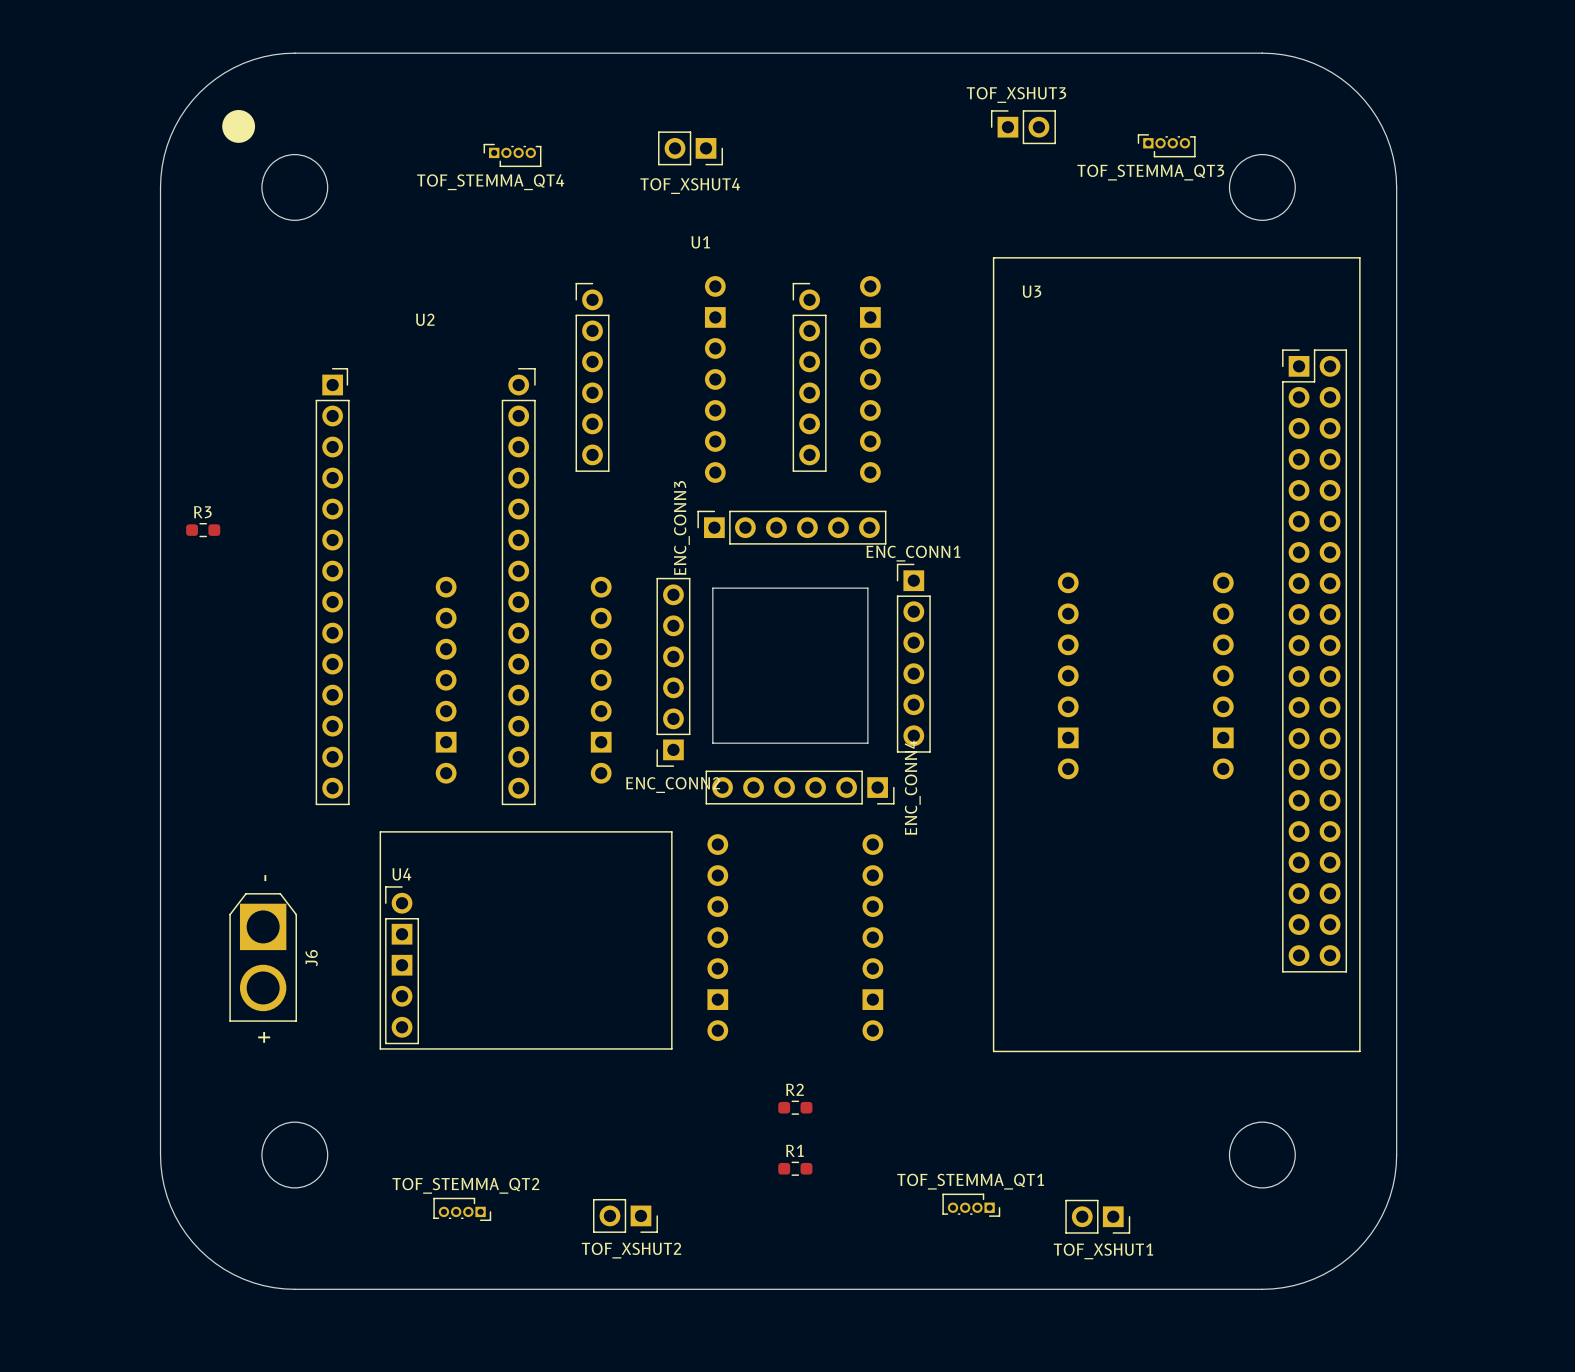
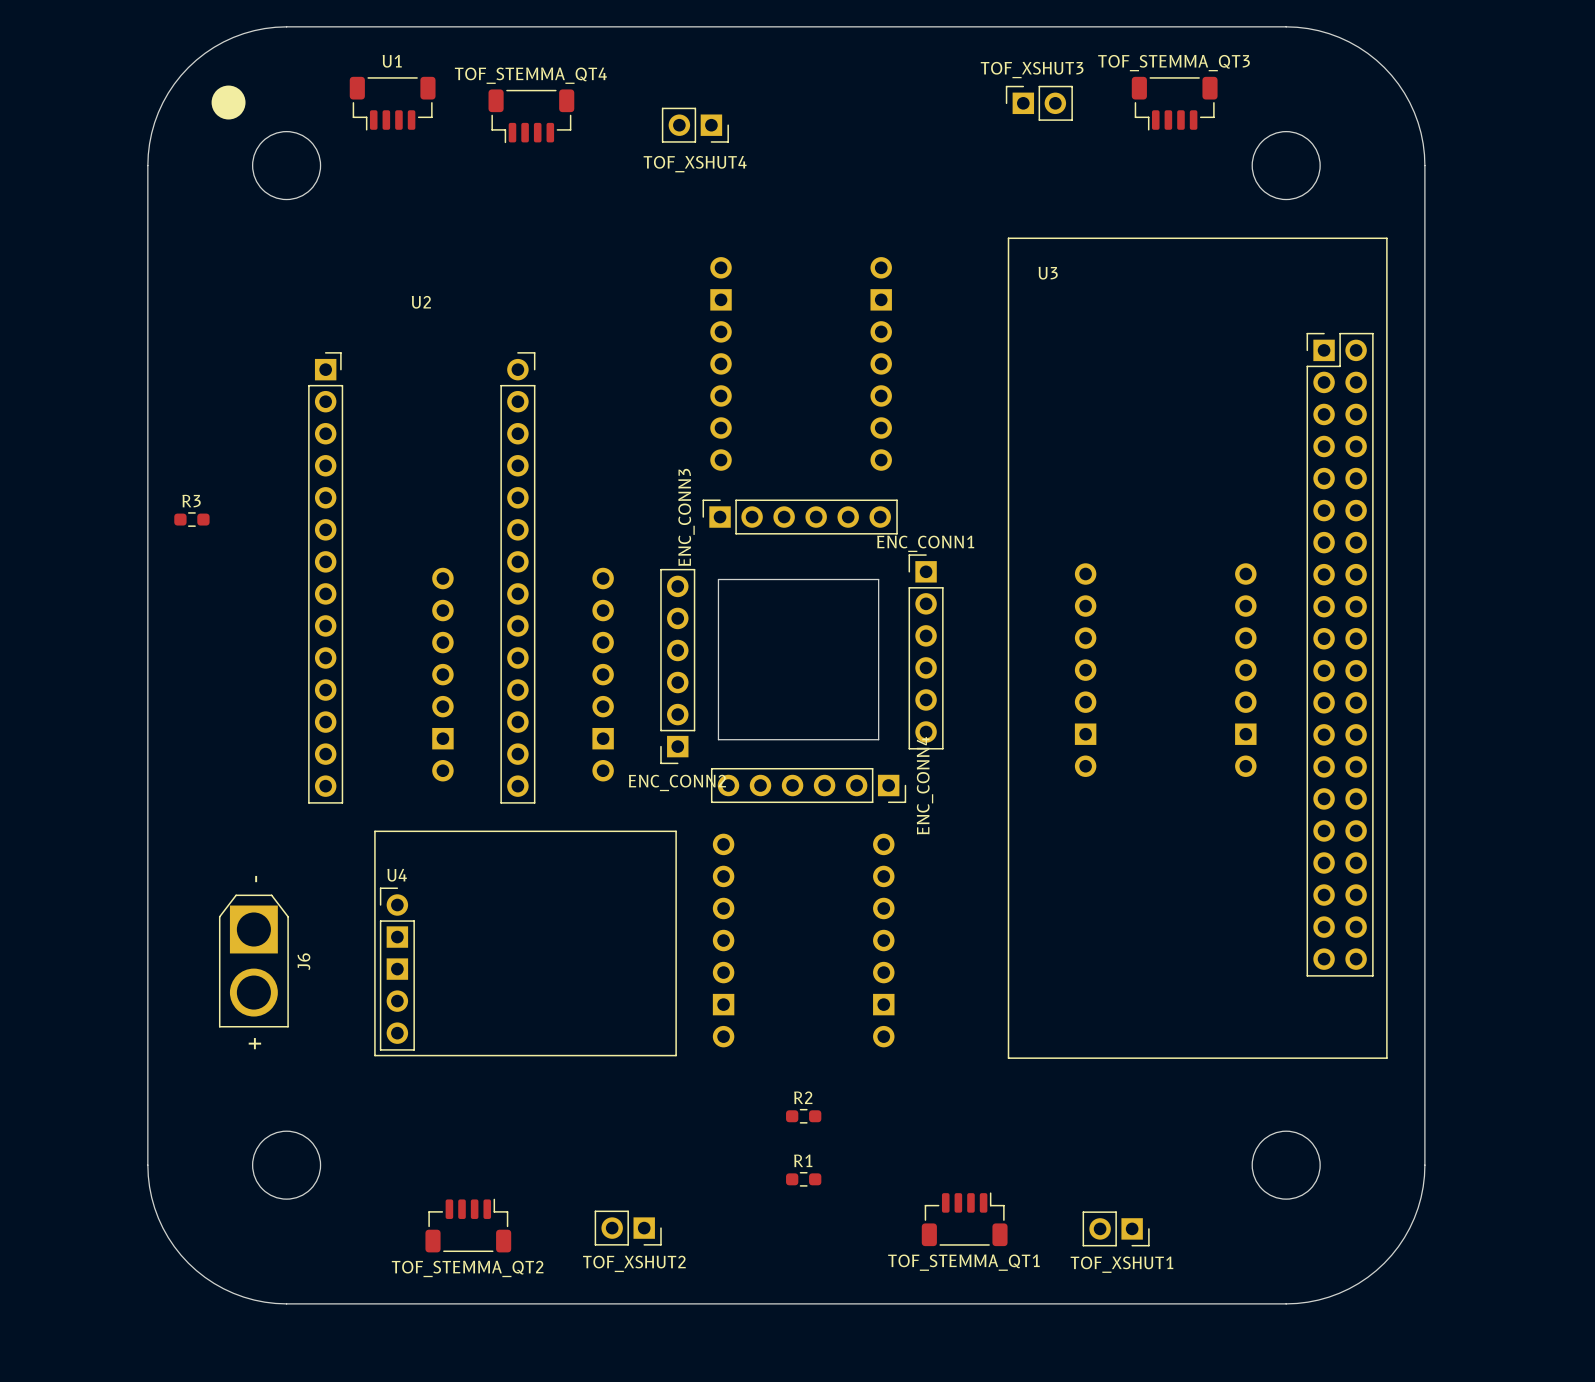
TOF_STEMMA_QT3 footprint: [1137, 134, 1196, 158] -> [1131, 76, 1218, 131]
TOF_STEMMA_QT4 footprint: [483, 143, 542, 168] -> [488, 89, 575, 144]
TOF_STEMMA_QT3 name position: TOF_STEMMA_QT3 (1150, 172) -> TOF_STEMMA_QT3 (1174, 63)
TOF_STEMMA_QT4 name position: TOF_STEMMA_QT4 (490, 182) -> TOF_STEMMA_QT4 (530, 75)
U1 name position: U1 (700, 242) -> U1 (392, 61)
U1 footprint: [575, 282, 827, 472] -> [349, 76, 436, 131]
TOF_STEMMA_QT1 name position: TOF_STEMMA_QT1 (970, 1181) -> TOF_STEMMA_QT1 (963, 1262)
TOF_STEMMA_QT2 name position: TOF_STEMMA_QT2 (465, 1185) -> TOF_STEMMA_QT2 (467, 1268)
TOF_STEMMA_QT1 footprint: [942, 1193, 1001, 1217] -> [921, 1192, 1008, 1247]
TOF_STEMMA_QT2 footprint: [433, 1197, 492, 1222] -> [425, 1198, 512, 1253]

